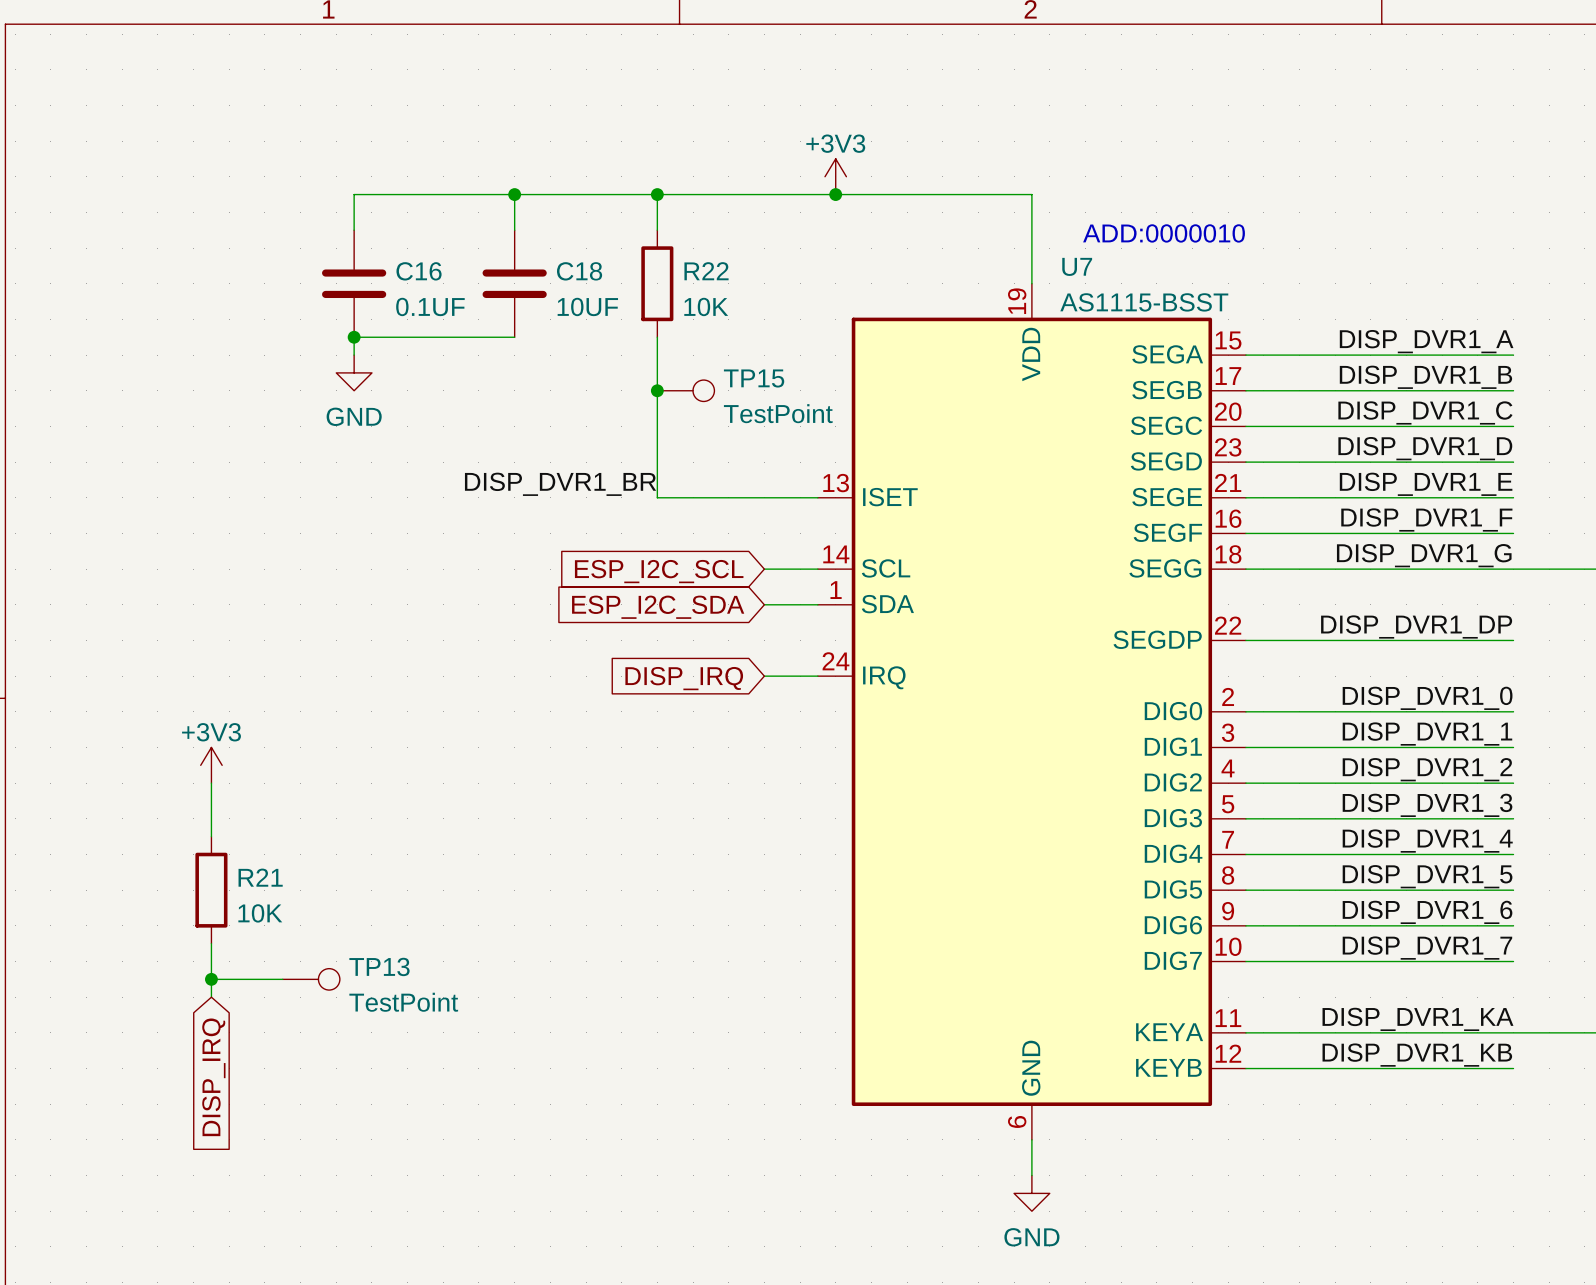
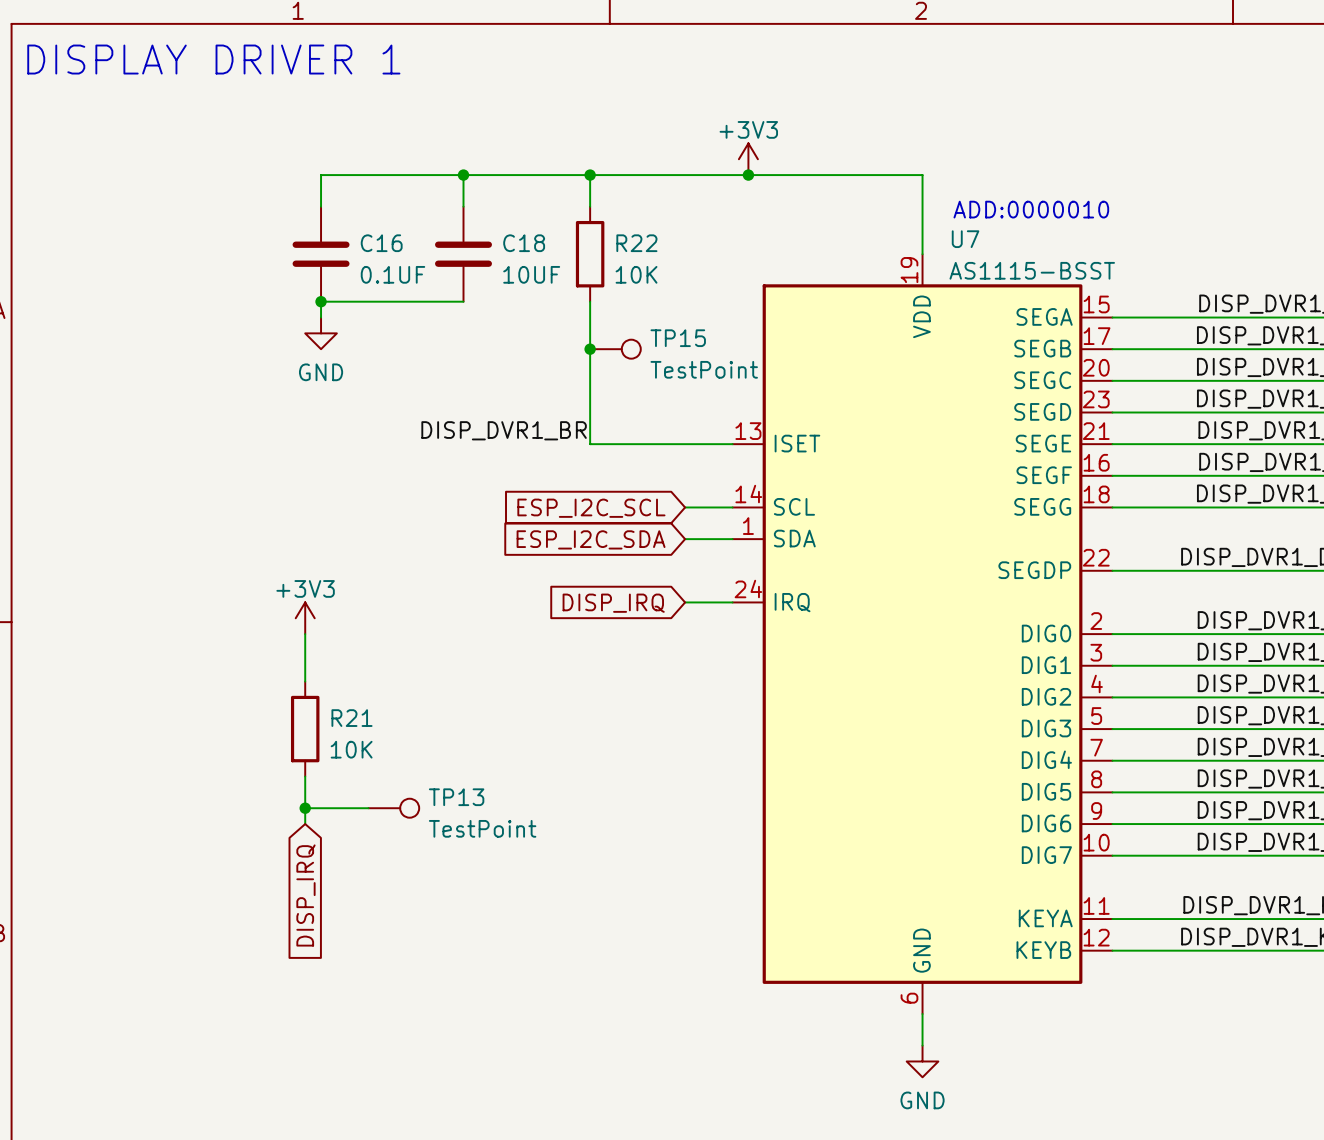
text: none -> DISPLAY DRIVER 1 (213, 59)
power symbol position: +3V3 (211, 765) -> +3V3 (305, 618)
wire: (211, 783) (211, 836) -> (305, 634) (305, 681)
R21 position: (211, 890) -> (305, 729)
junction: none -> (305, 808)
wire: (211, 943) (211, 997) -> (305, 776) (305, 824)
wire: (211, 979) (282, 979) -> (305, 808) (368, 808)
junction: (211, 979) -> none
TP13 position: (311, 979) -> (393, 808)
global label position: DISP_IRQ (213, 1077) -> DISP_IRQ (305, 895)

